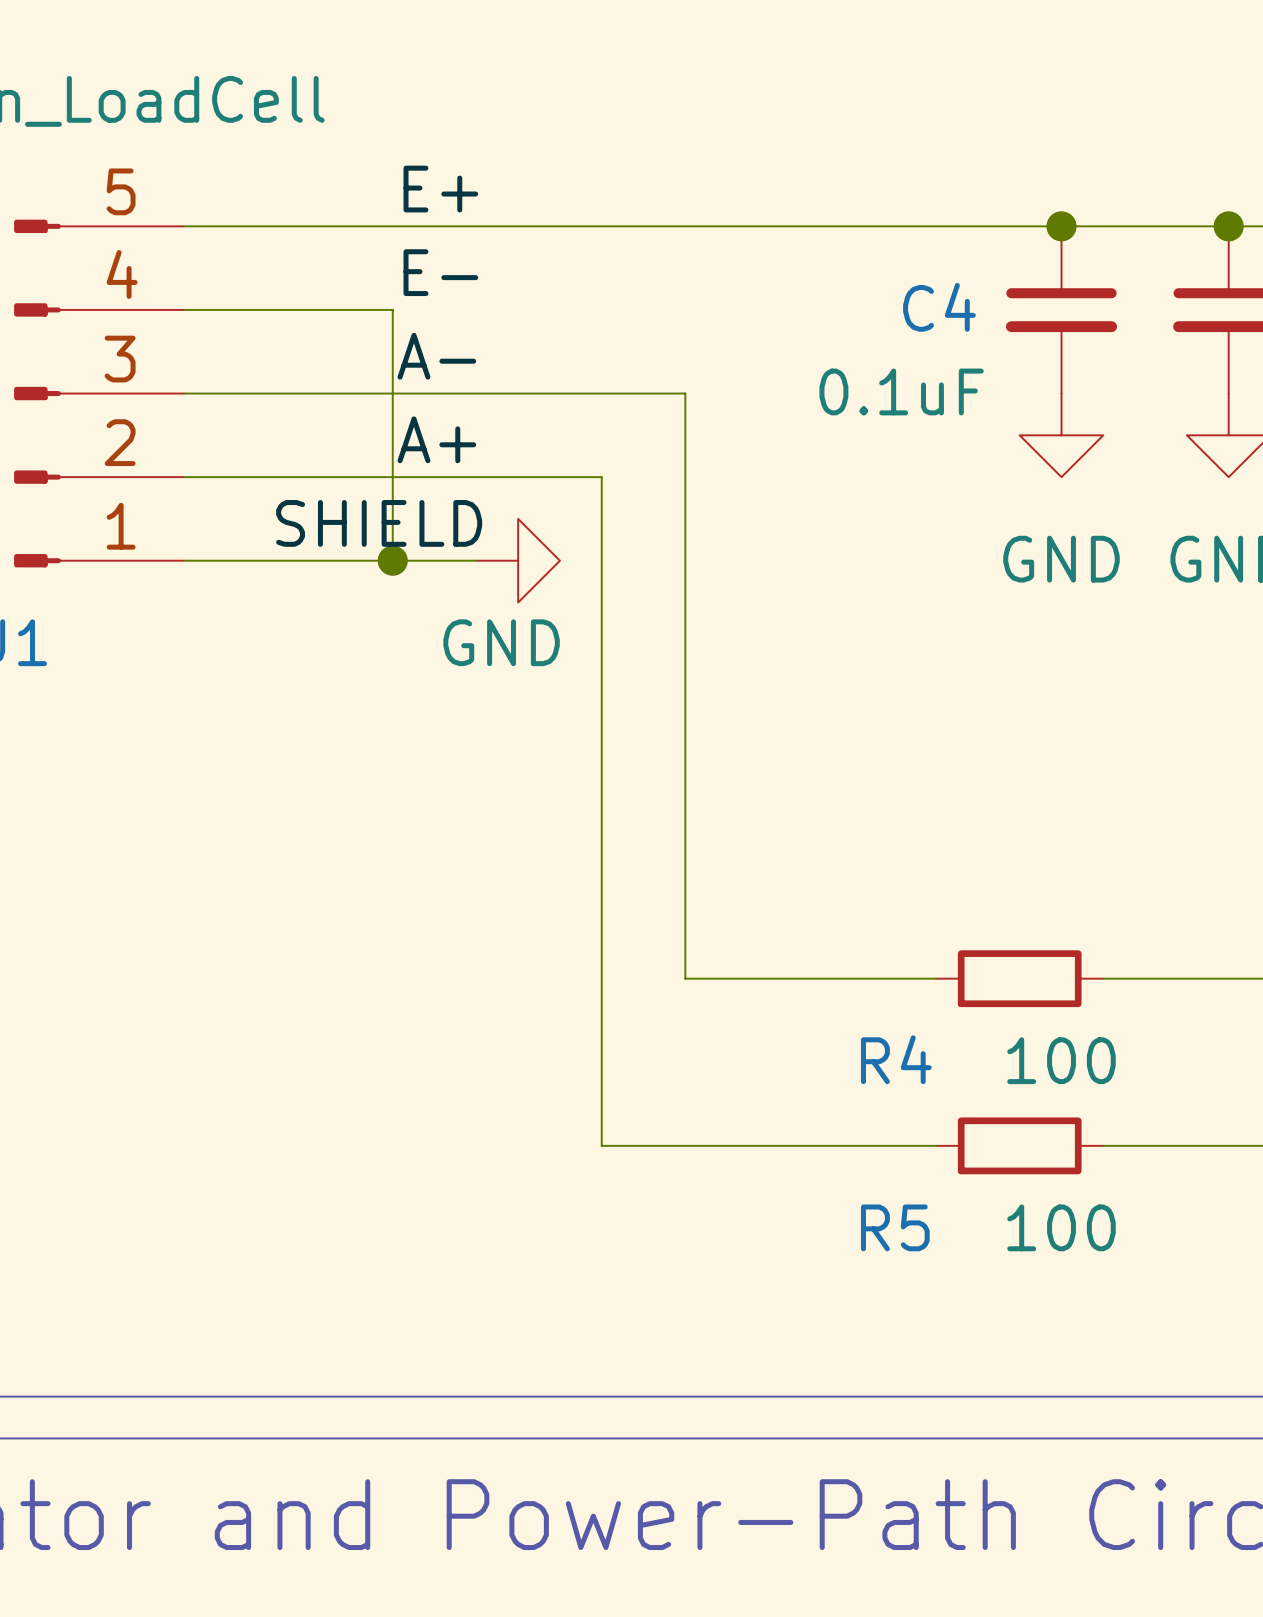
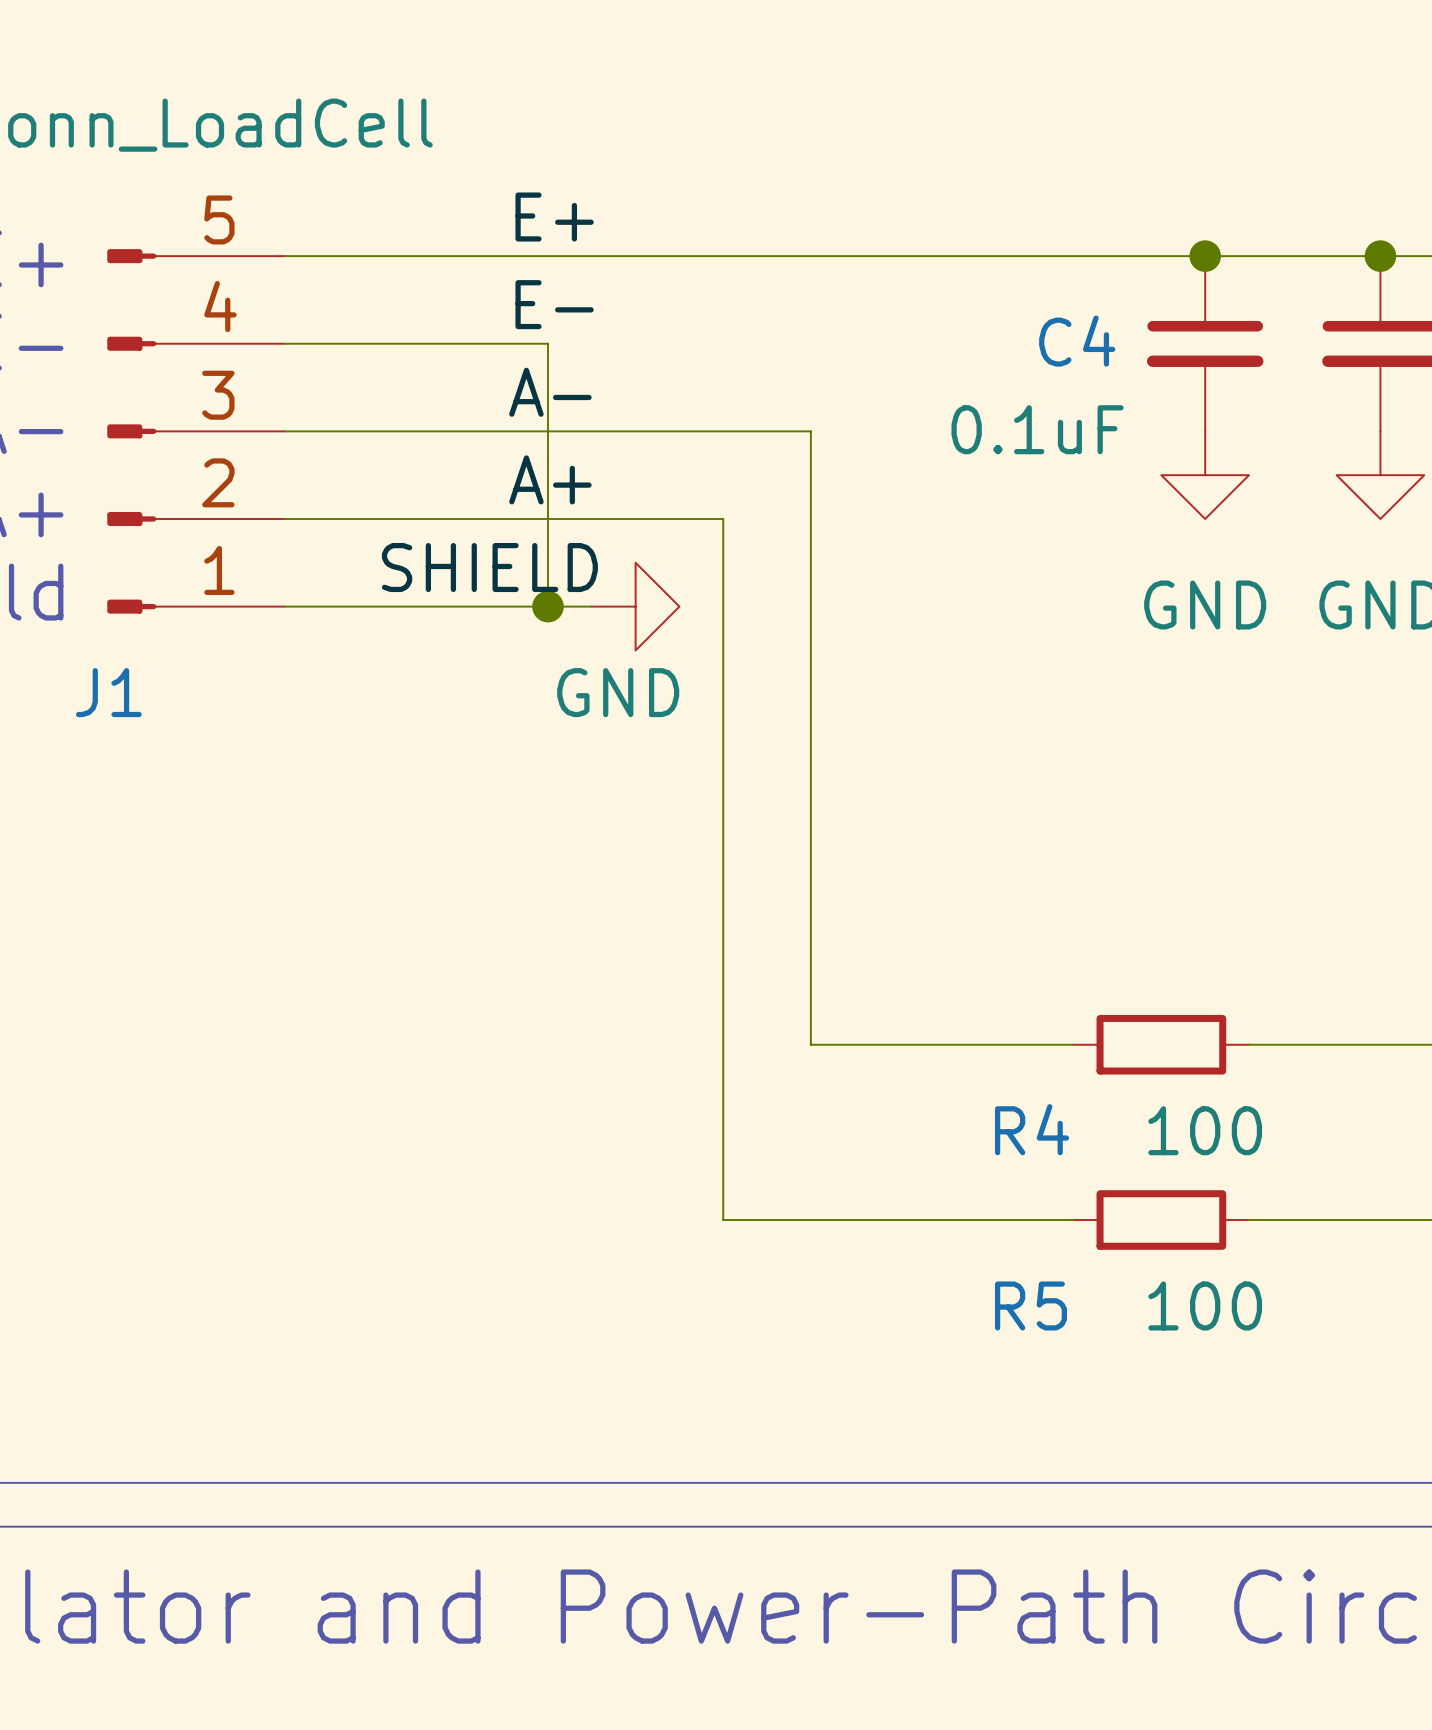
wire: (392, 309) (392, 560) -> (504, 343) (548, 343) (548, 606)
junction position: (392, 560) -> (548, 606)

